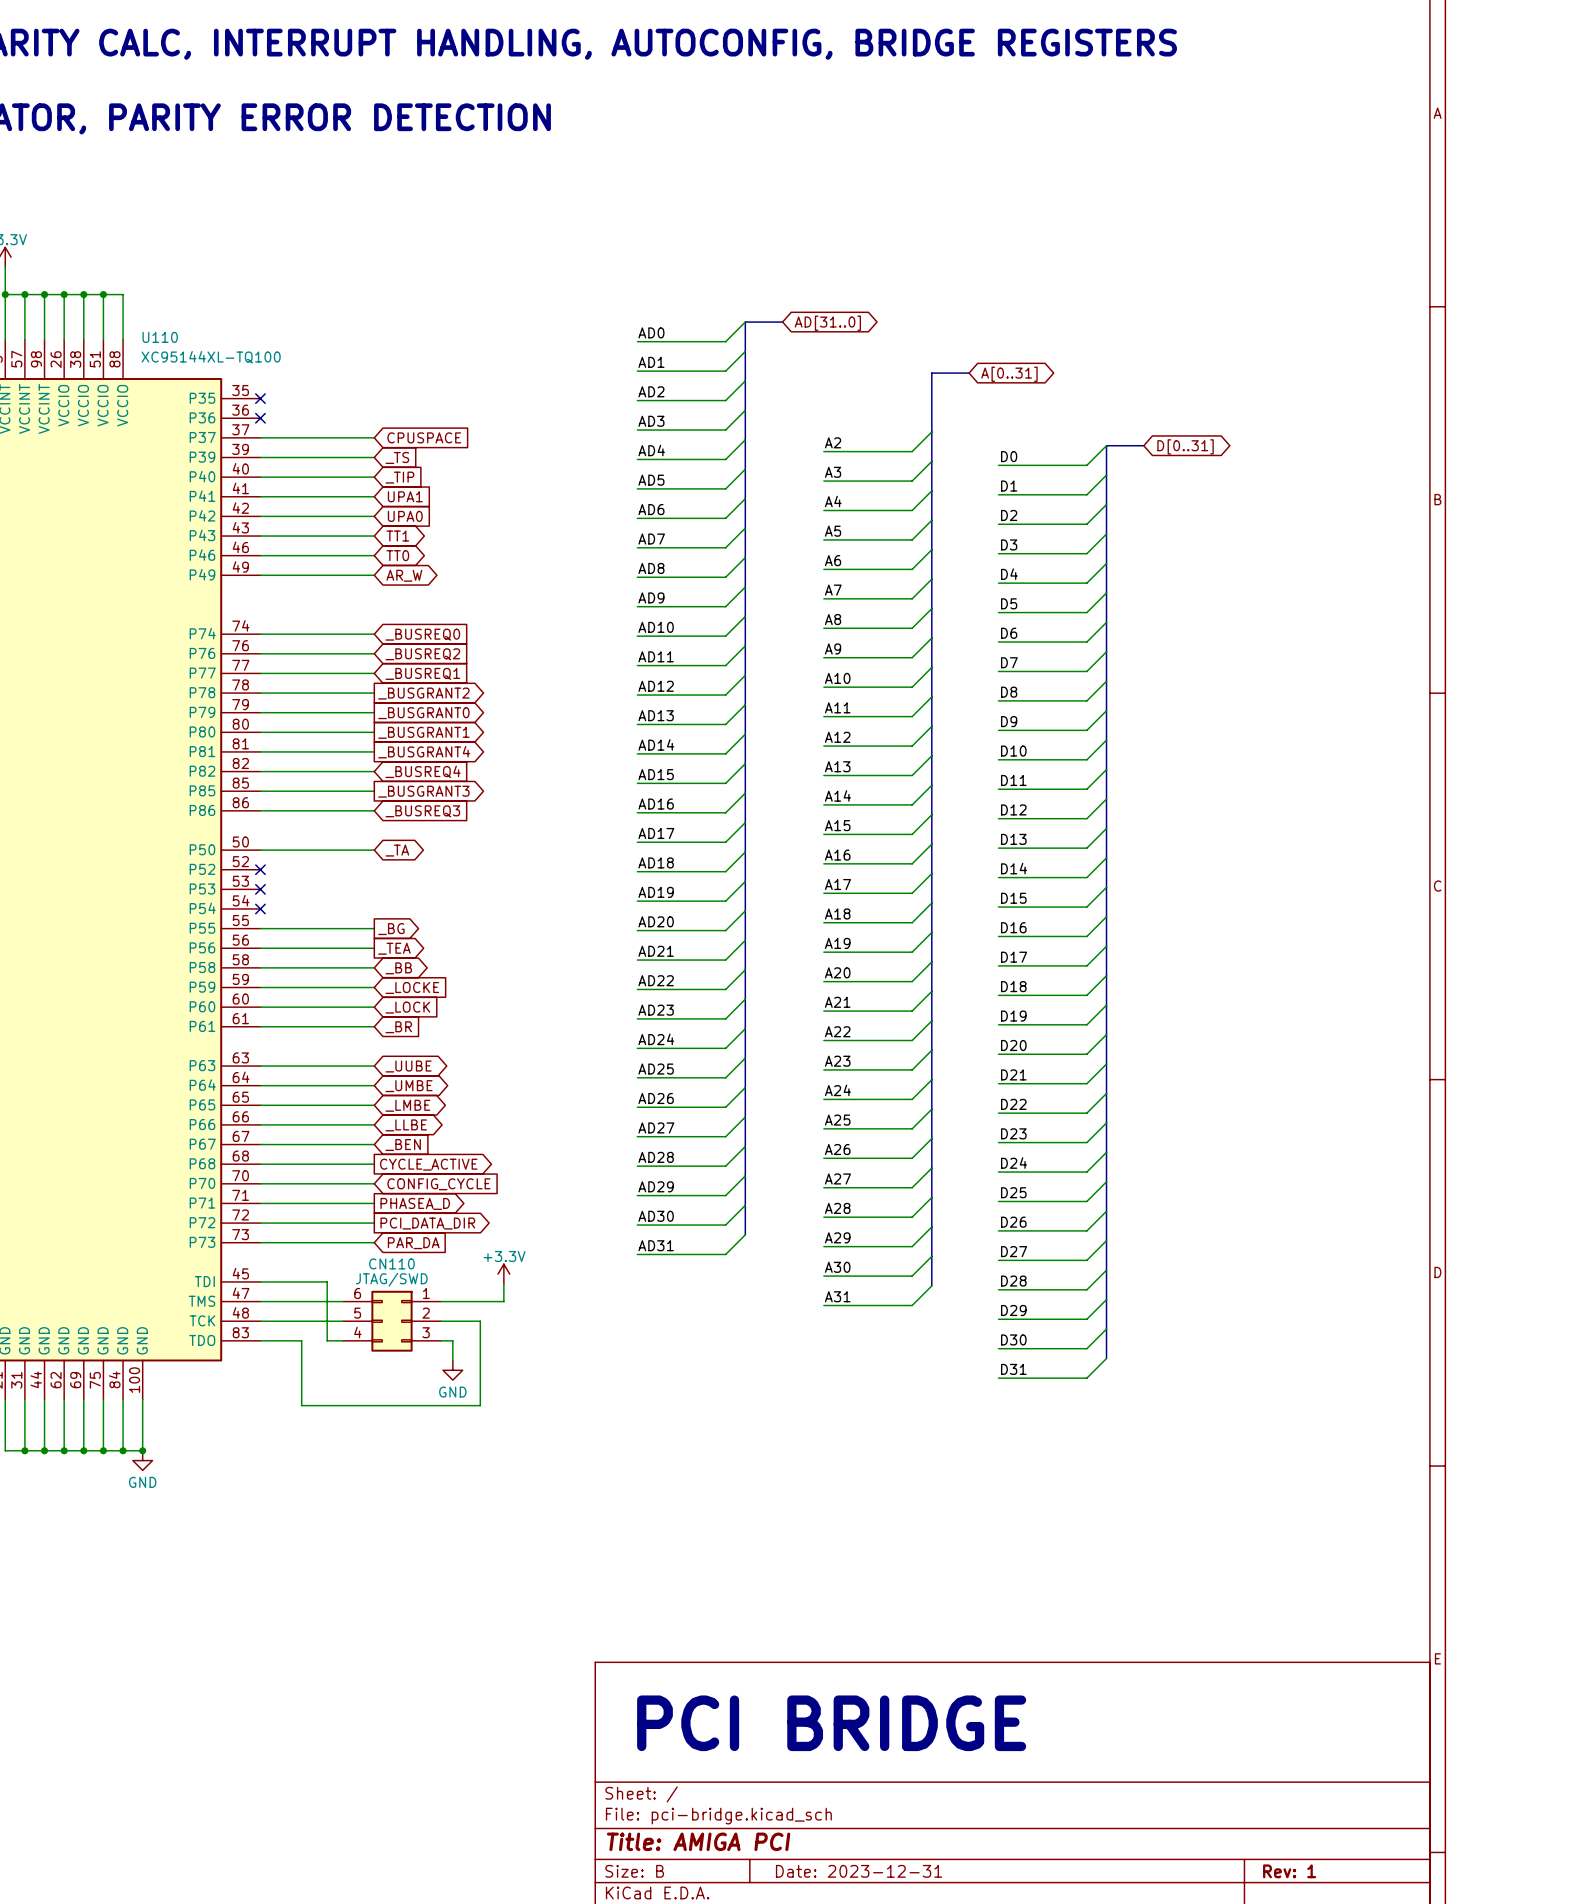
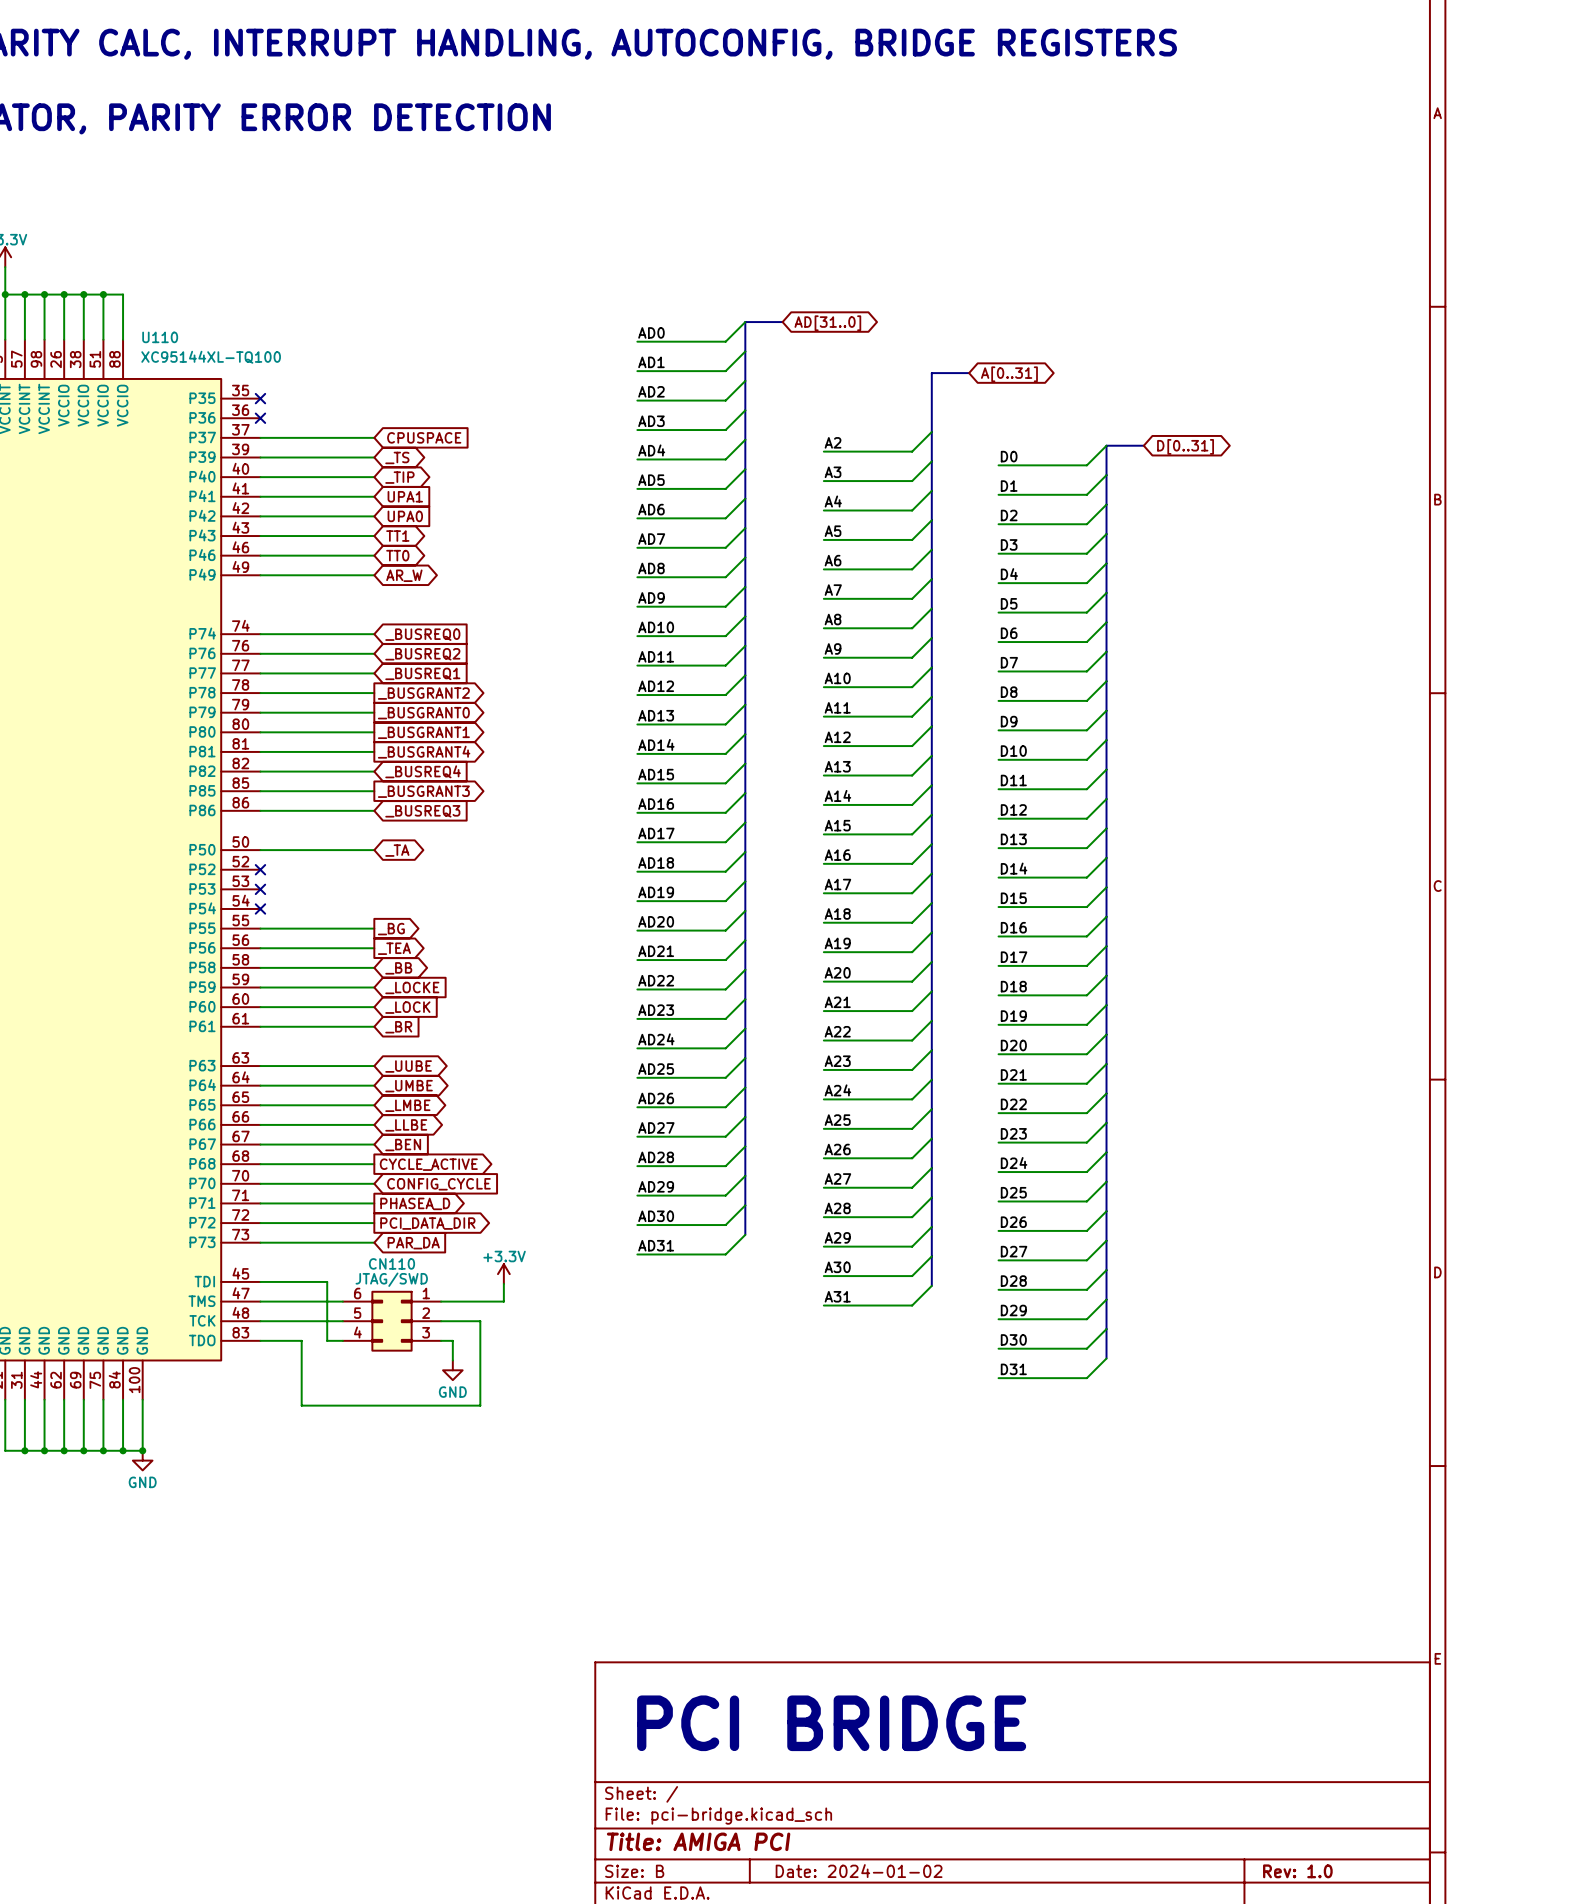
global label shape: input (397, 457) -> bidirectional (397, 457)
global label shape: input (399, 477) -> bidirectional (399, 477)
title block: Date: 2023-12-31 (859, 1871) -> Date: 2024-01-02 (859, 1871)
title block: Rev: 1 (1289, 1871) -> Rev: 1.0 (1297, 1871)

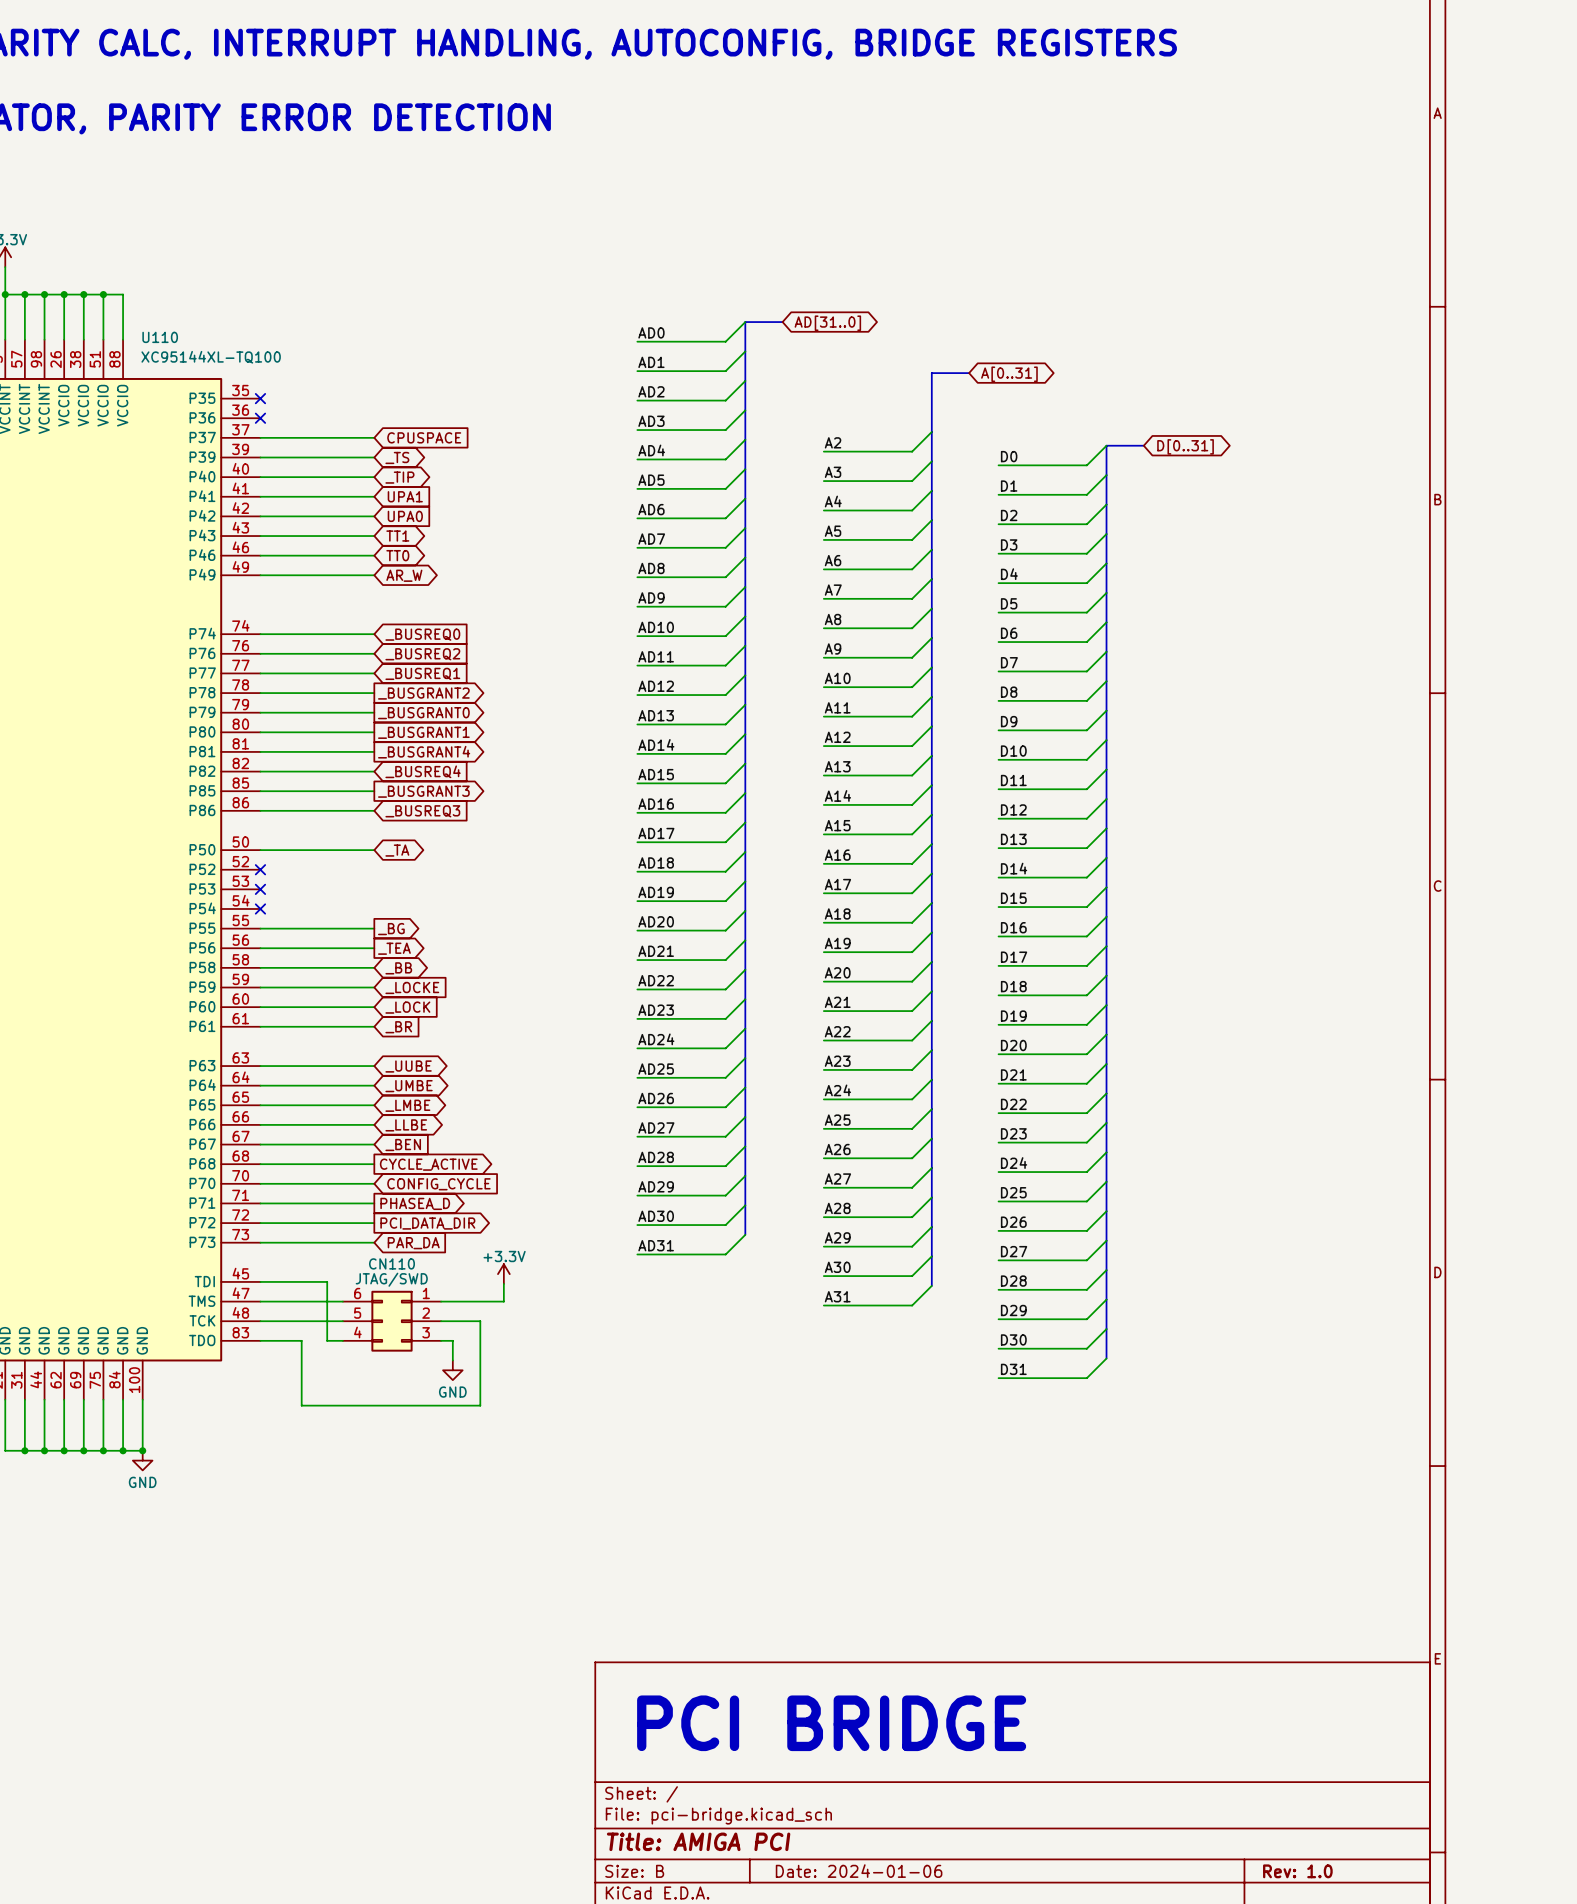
title block: Date: 2024-01-02 (859, 1871) -> Date: 2024-01-06 (859, 1871)

